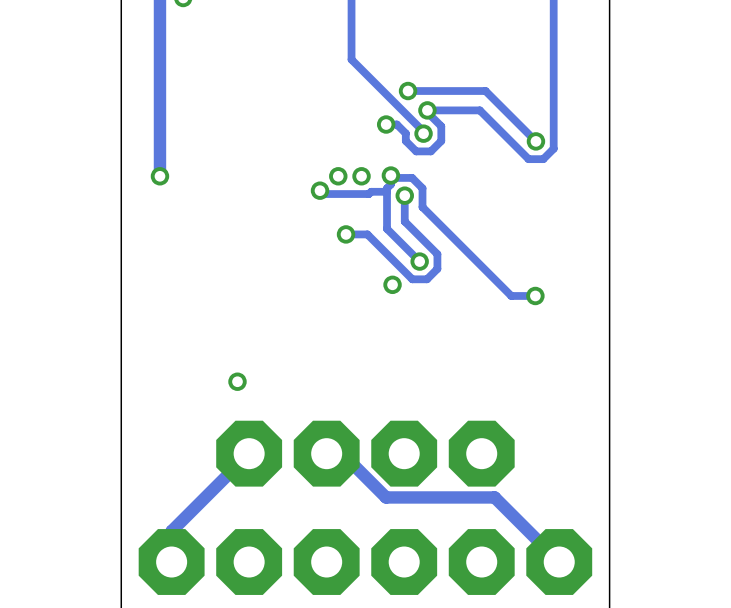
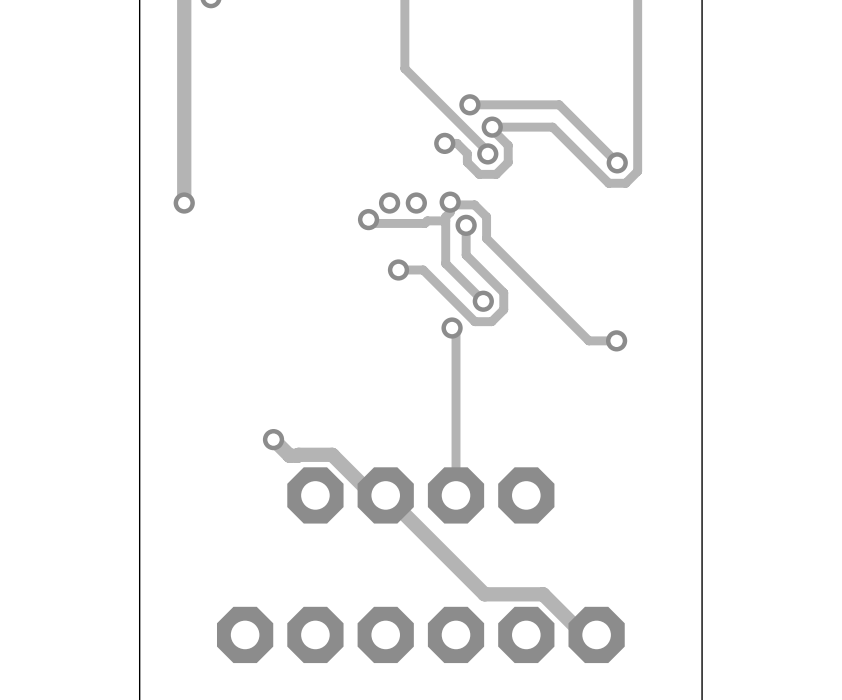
track: none -> (456, 331) (456, 495)
track: none -> (273, 439) (289, 455) (332, 454) (372, 495) (385, 495) (484, 594) (543, 594) (583, 634) (596, 634)
part footprint: [293, 420, 360, 487] -> [357, 467, 414, 524]
part footprint: [371, 420, 438, 487] -> [427, 467, 485, 524]
part: none -> (315, 495)
part: none -> (526, 495)
track: (249, 453) (171, 531) (171, 562) -> none
part: (249, 453) -> none
track: (326, 453) (342, 453) (386, 497) (494, 497) (559, 562) -> none
part: (481, 453) -> none
part footprint: [293, 529, 360, 595] -> [357, 606, 414, 664]
part footprint: [371, 529, 438, 595] -> [427, 606, 485, 664]
part: none -> (245, 634)
part: none -> (315, 634)
part: none -> (526, 634)
part: none -> (596, 634)
part: (171, 562) -> none
part: (249, 562) -> none
part: (481, 562) -> none
part: (559, 562) -> none

